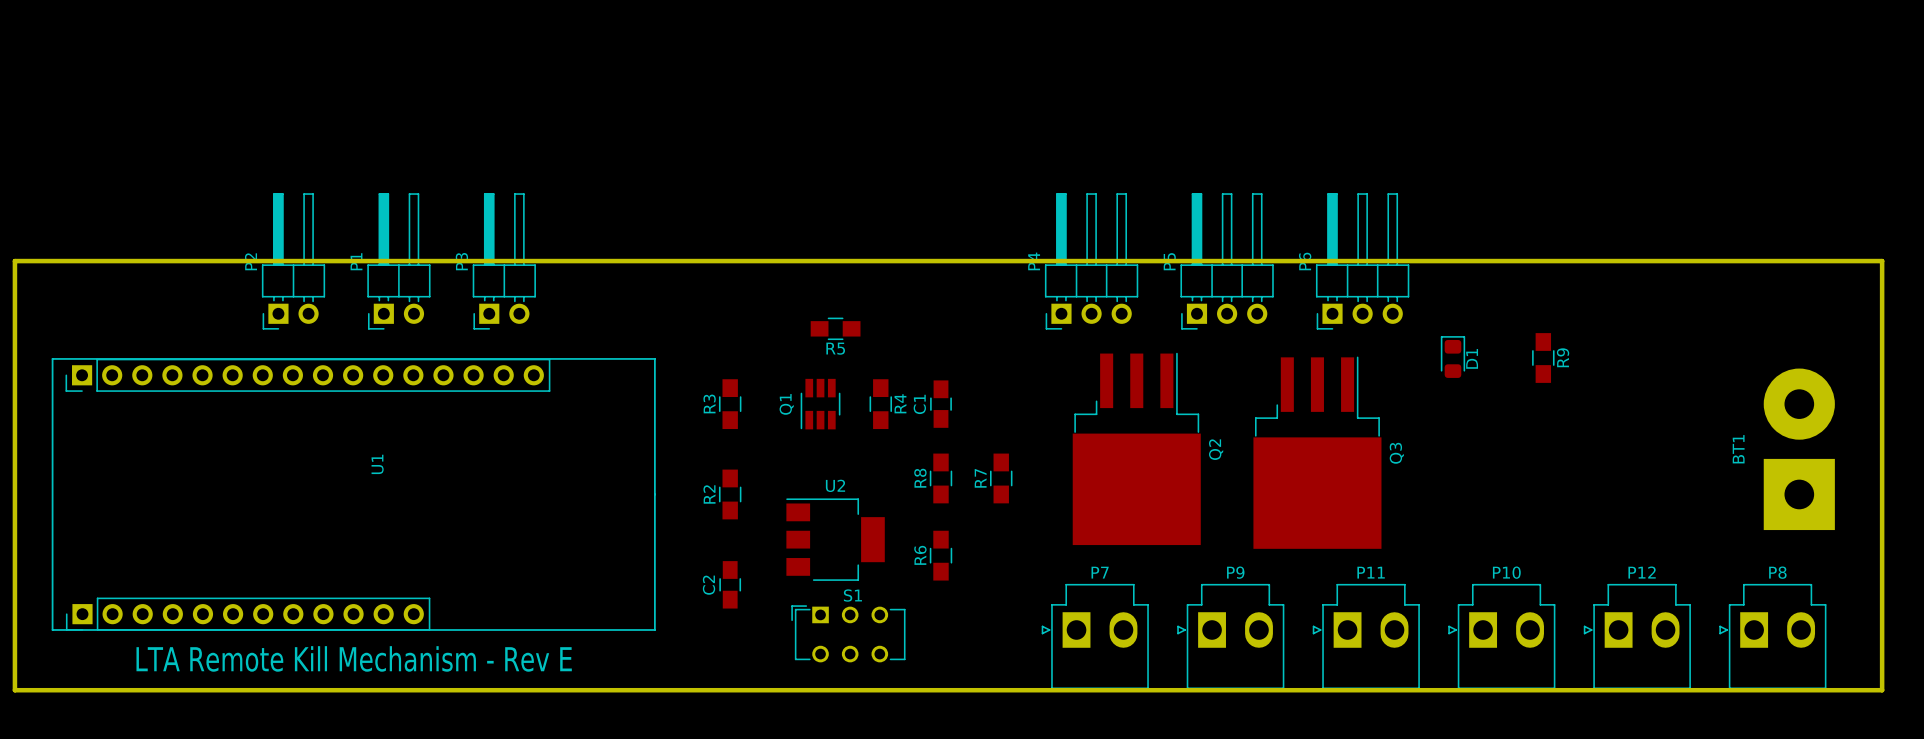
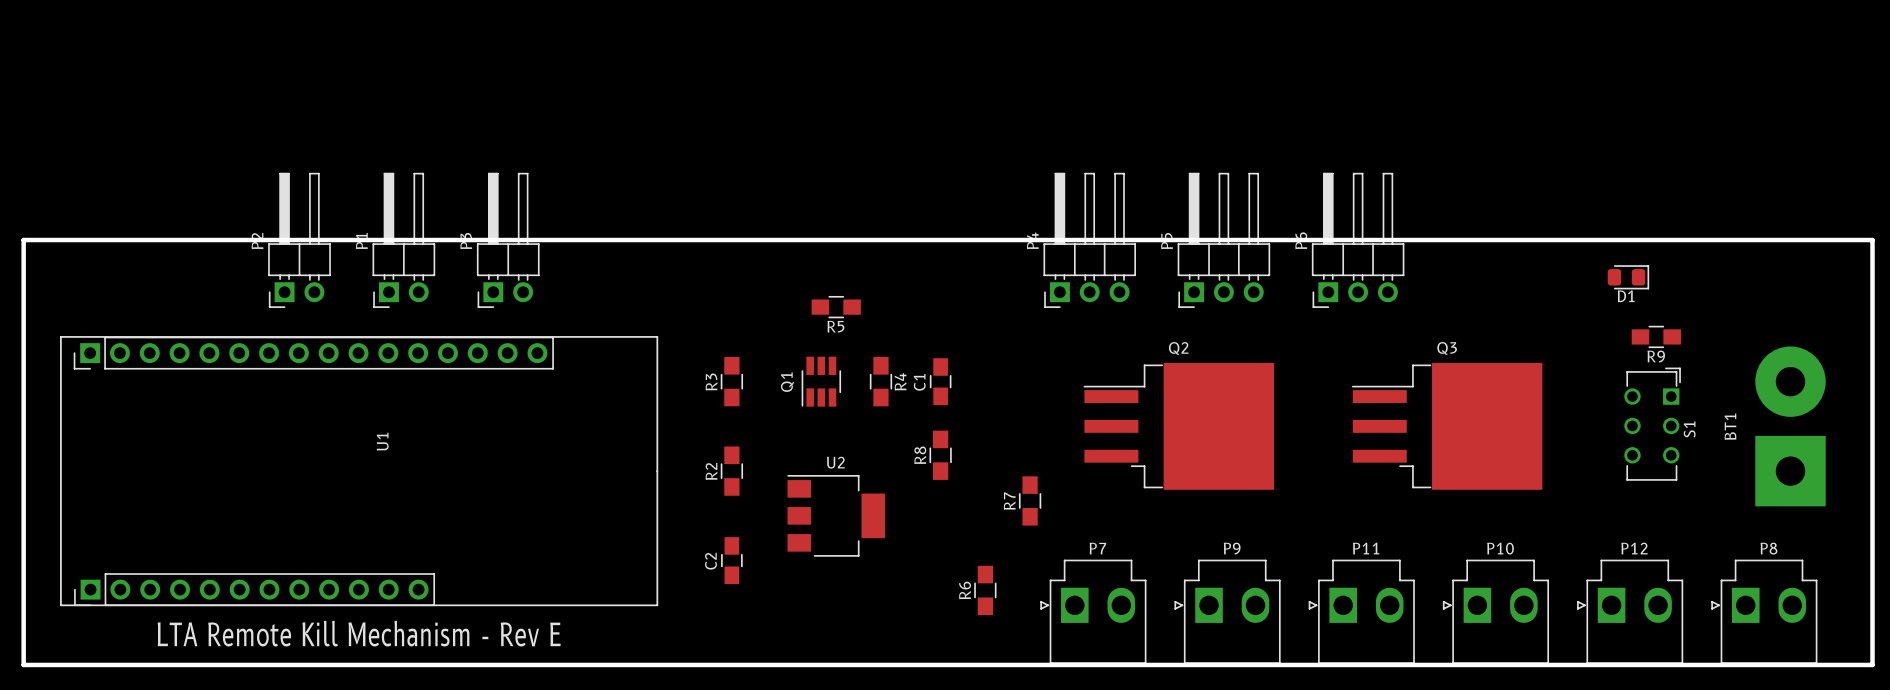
D1 rotation: 0° (1452, 357) -> 90° clockwise (1628, 277)
D1 position: (1452, 357) -> (1628, 277)
R9 rotation: 0° (1543, 358) -> 90° clockwise (1656, 336)
R9 position: (1543, 358) -> (1656, 336)
Q2 rotation: 0° (1136, 448) -> 90° counterclockwise (1178, 426)
Q3 rotation: 0° (1317, 452) -> 90° counterclockwise (1447, 426)
Q3 position: (1317, 452) -> (1447, 426)
R7 position: (1001, 478) -> (1030, 500)
R6 position: (941, 555) -> (985, 590)
S1 rotation: 0° (848, 633) -> 90° clockwise (1652, 424)
S1 position: (848, 633) -> (1652, 424)

